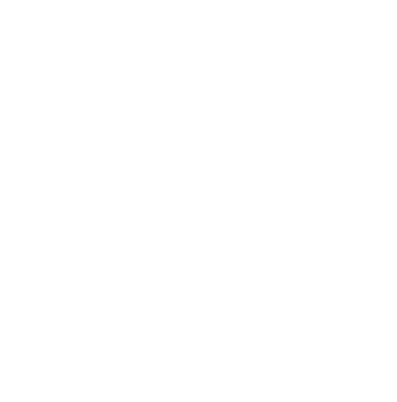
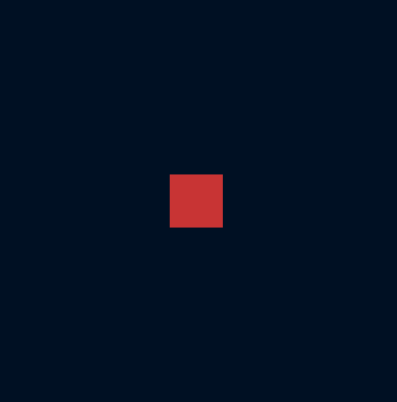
part: none -> (196, 200)

